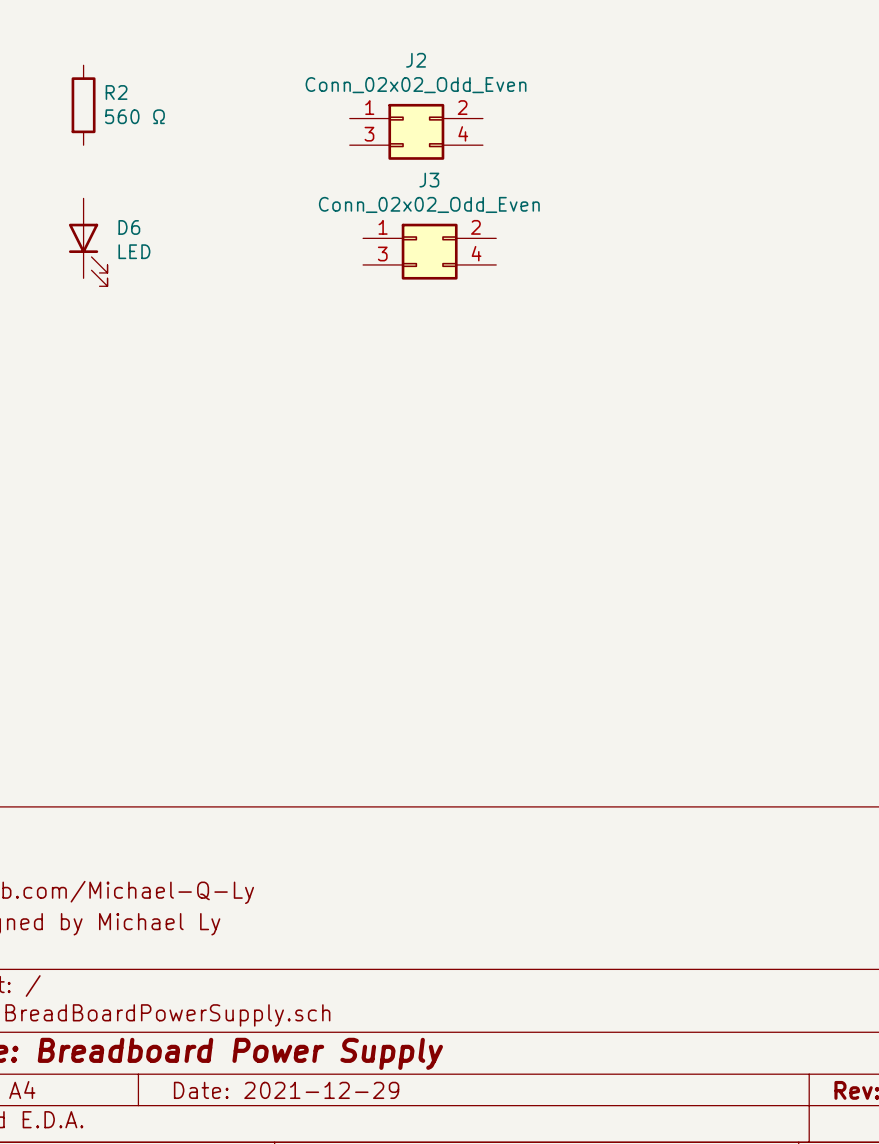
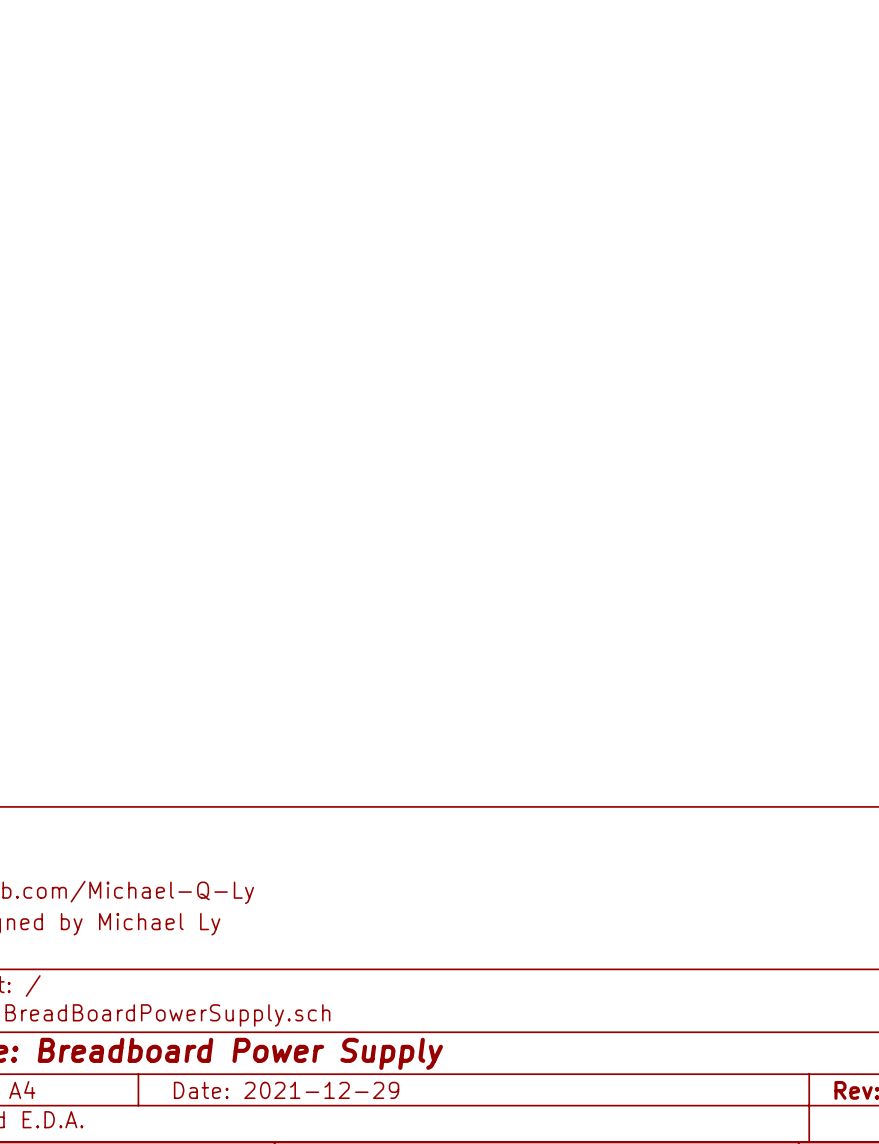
R2: 560 Ω (83, 105) -> none
J2: Conn_02x02_Odd_Even (416, 131) -> none
D6: LED (88, 242) -> none
J3: Conn_02x02_Odd_Even (429, 251) -> none

